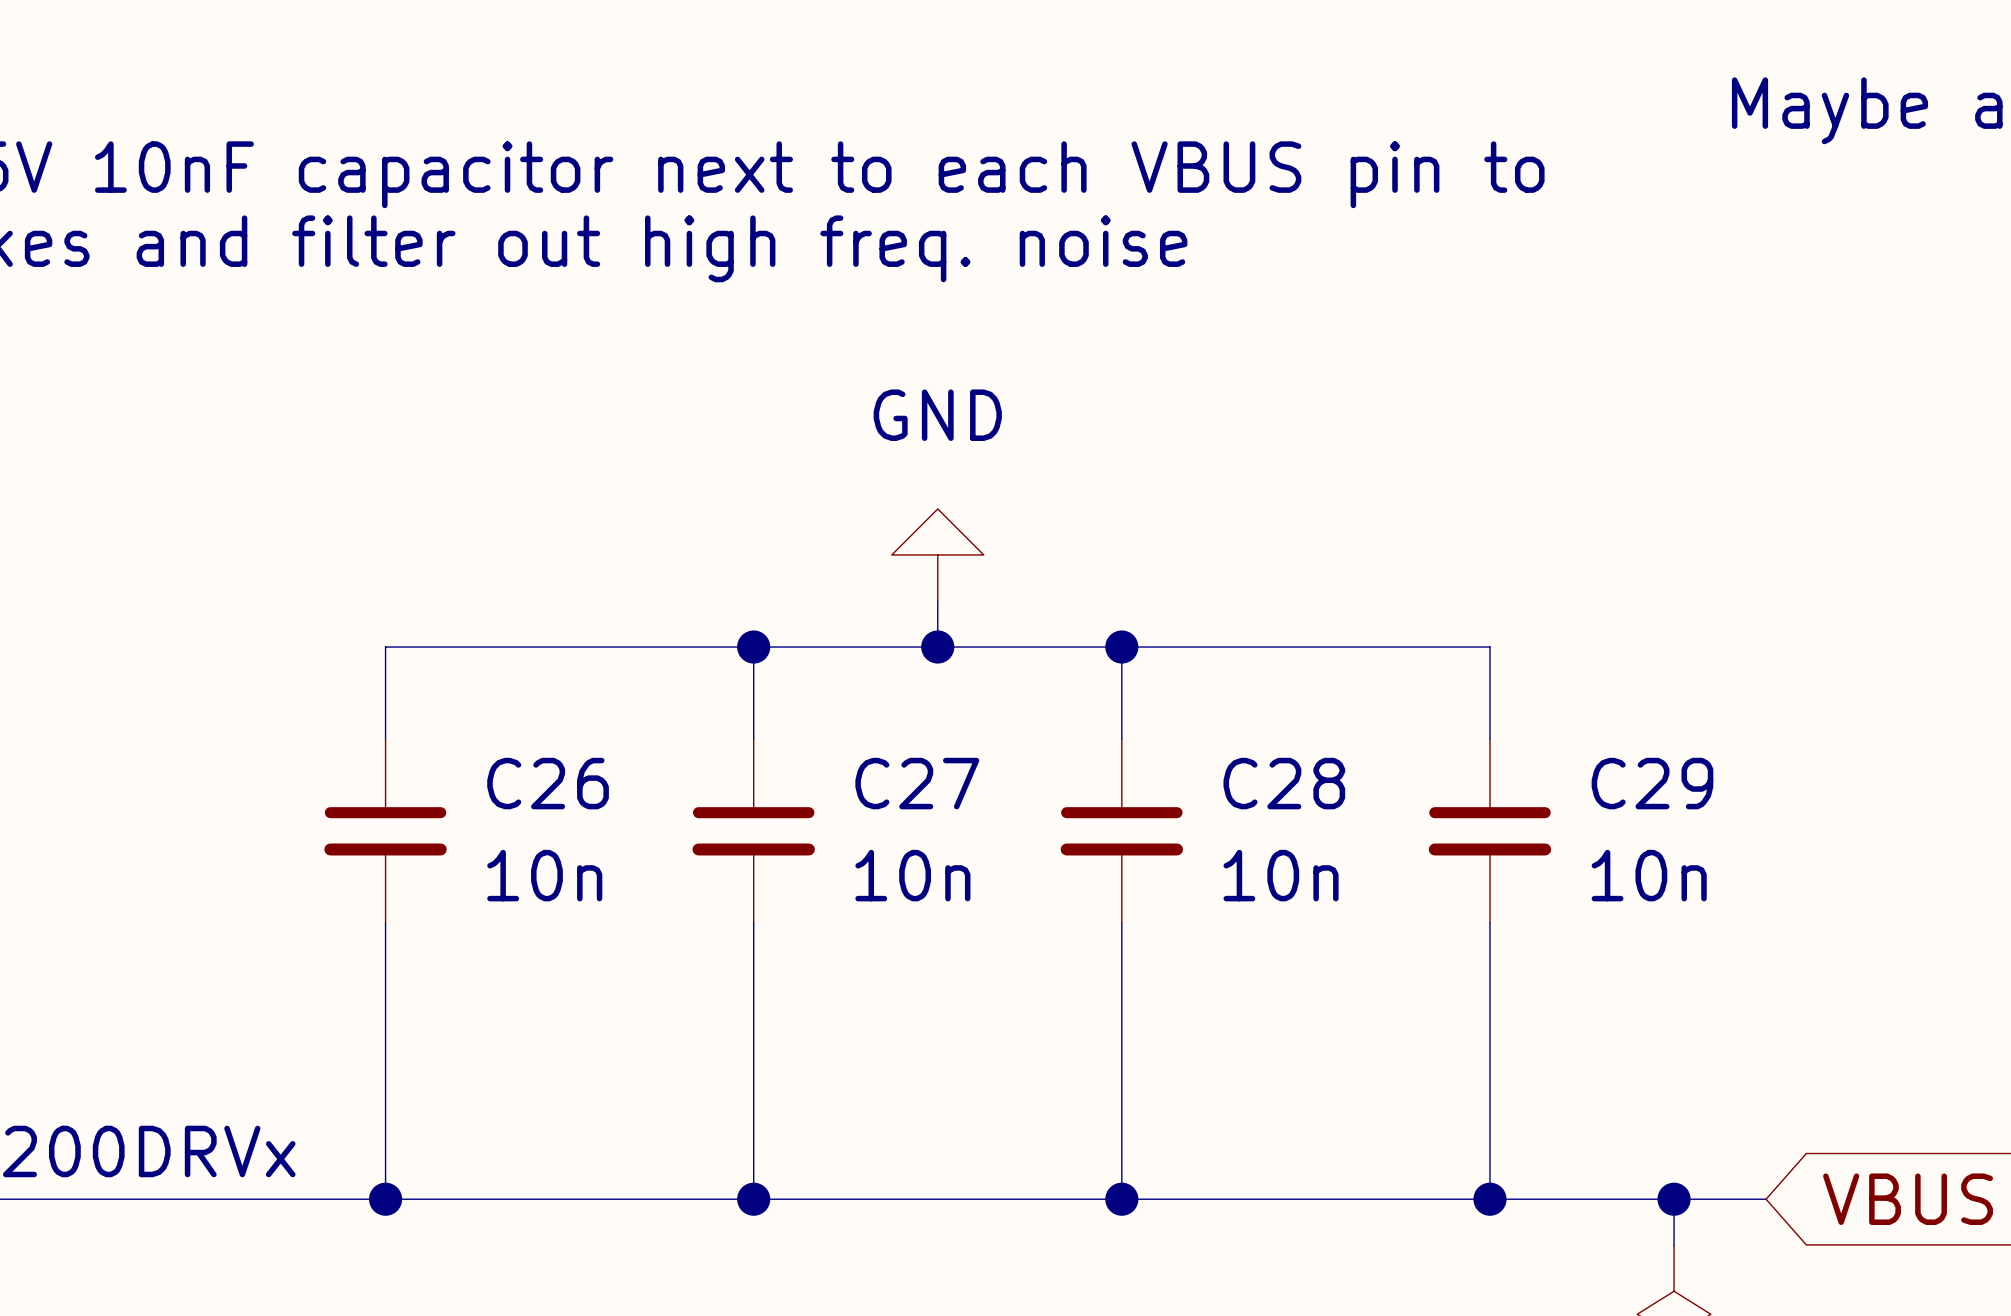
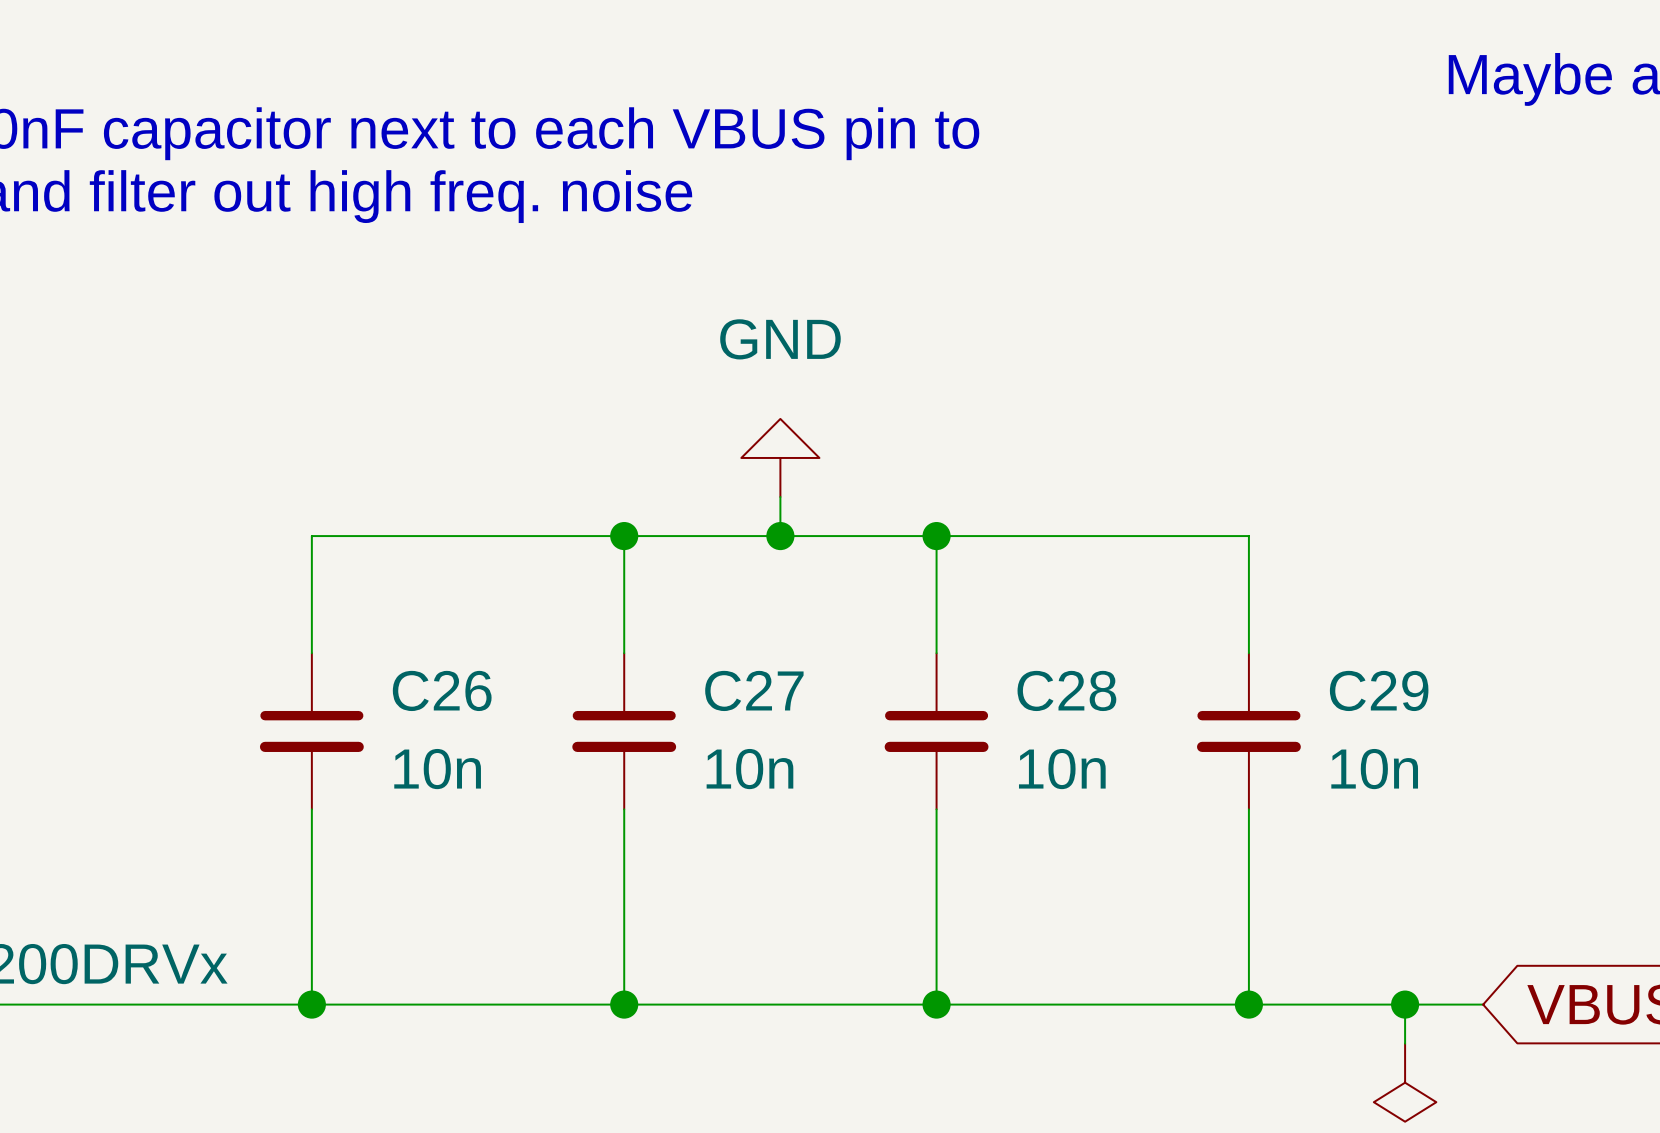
C26 position: (385, 831) -> (311, 731)
C27 position: (753, 831) -> (624, 731)
C28 position: (1121, 831) -> (936, 731)
C29 position: (1489, 831) -> (1248, 731)

